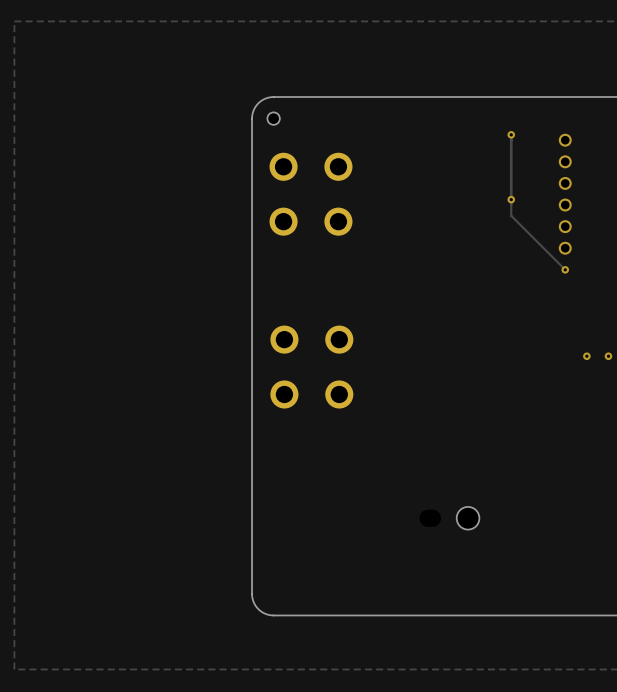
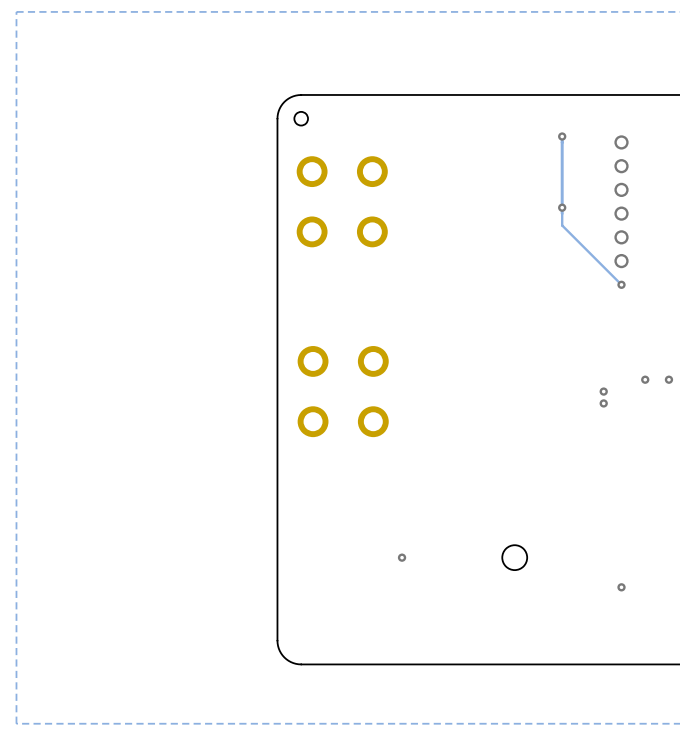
via: none -> (603, 391)
via: none -> (603, 403)
via: none -> (402, 557)
via: none -> (621, 587)

